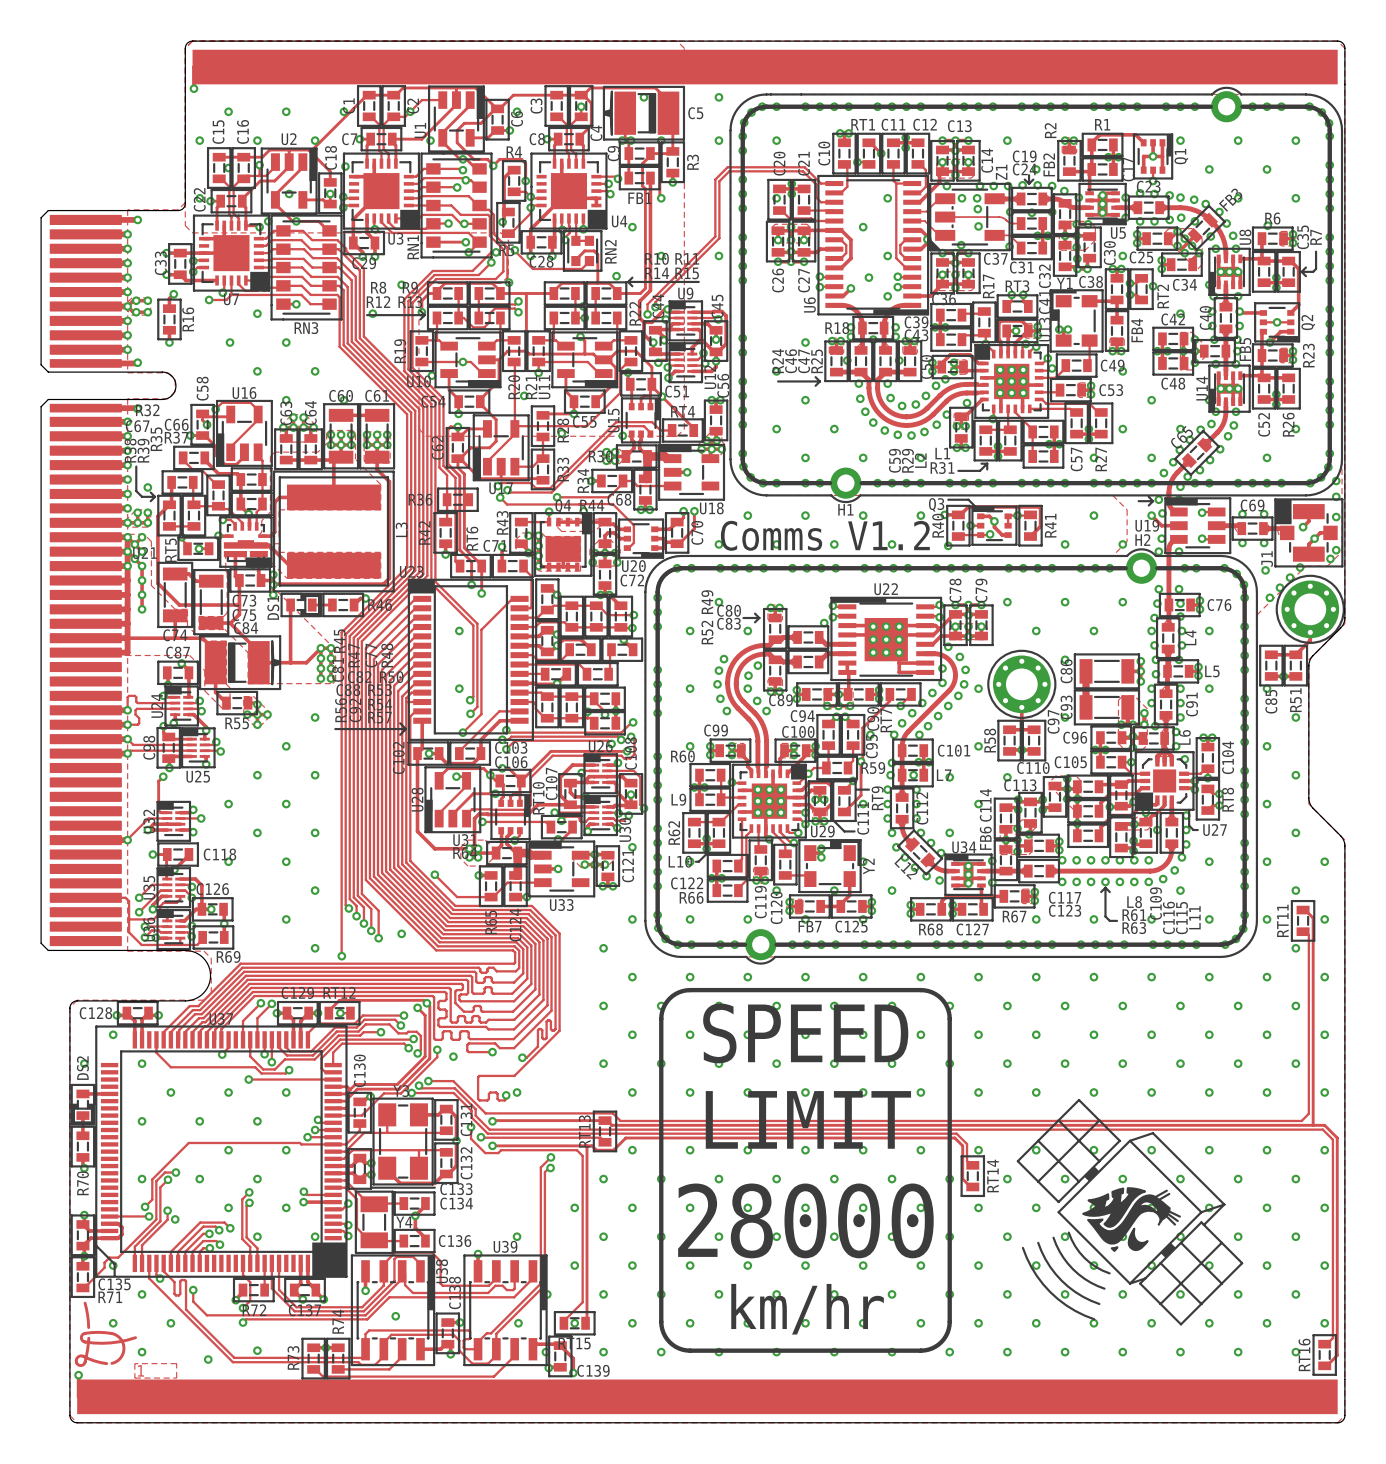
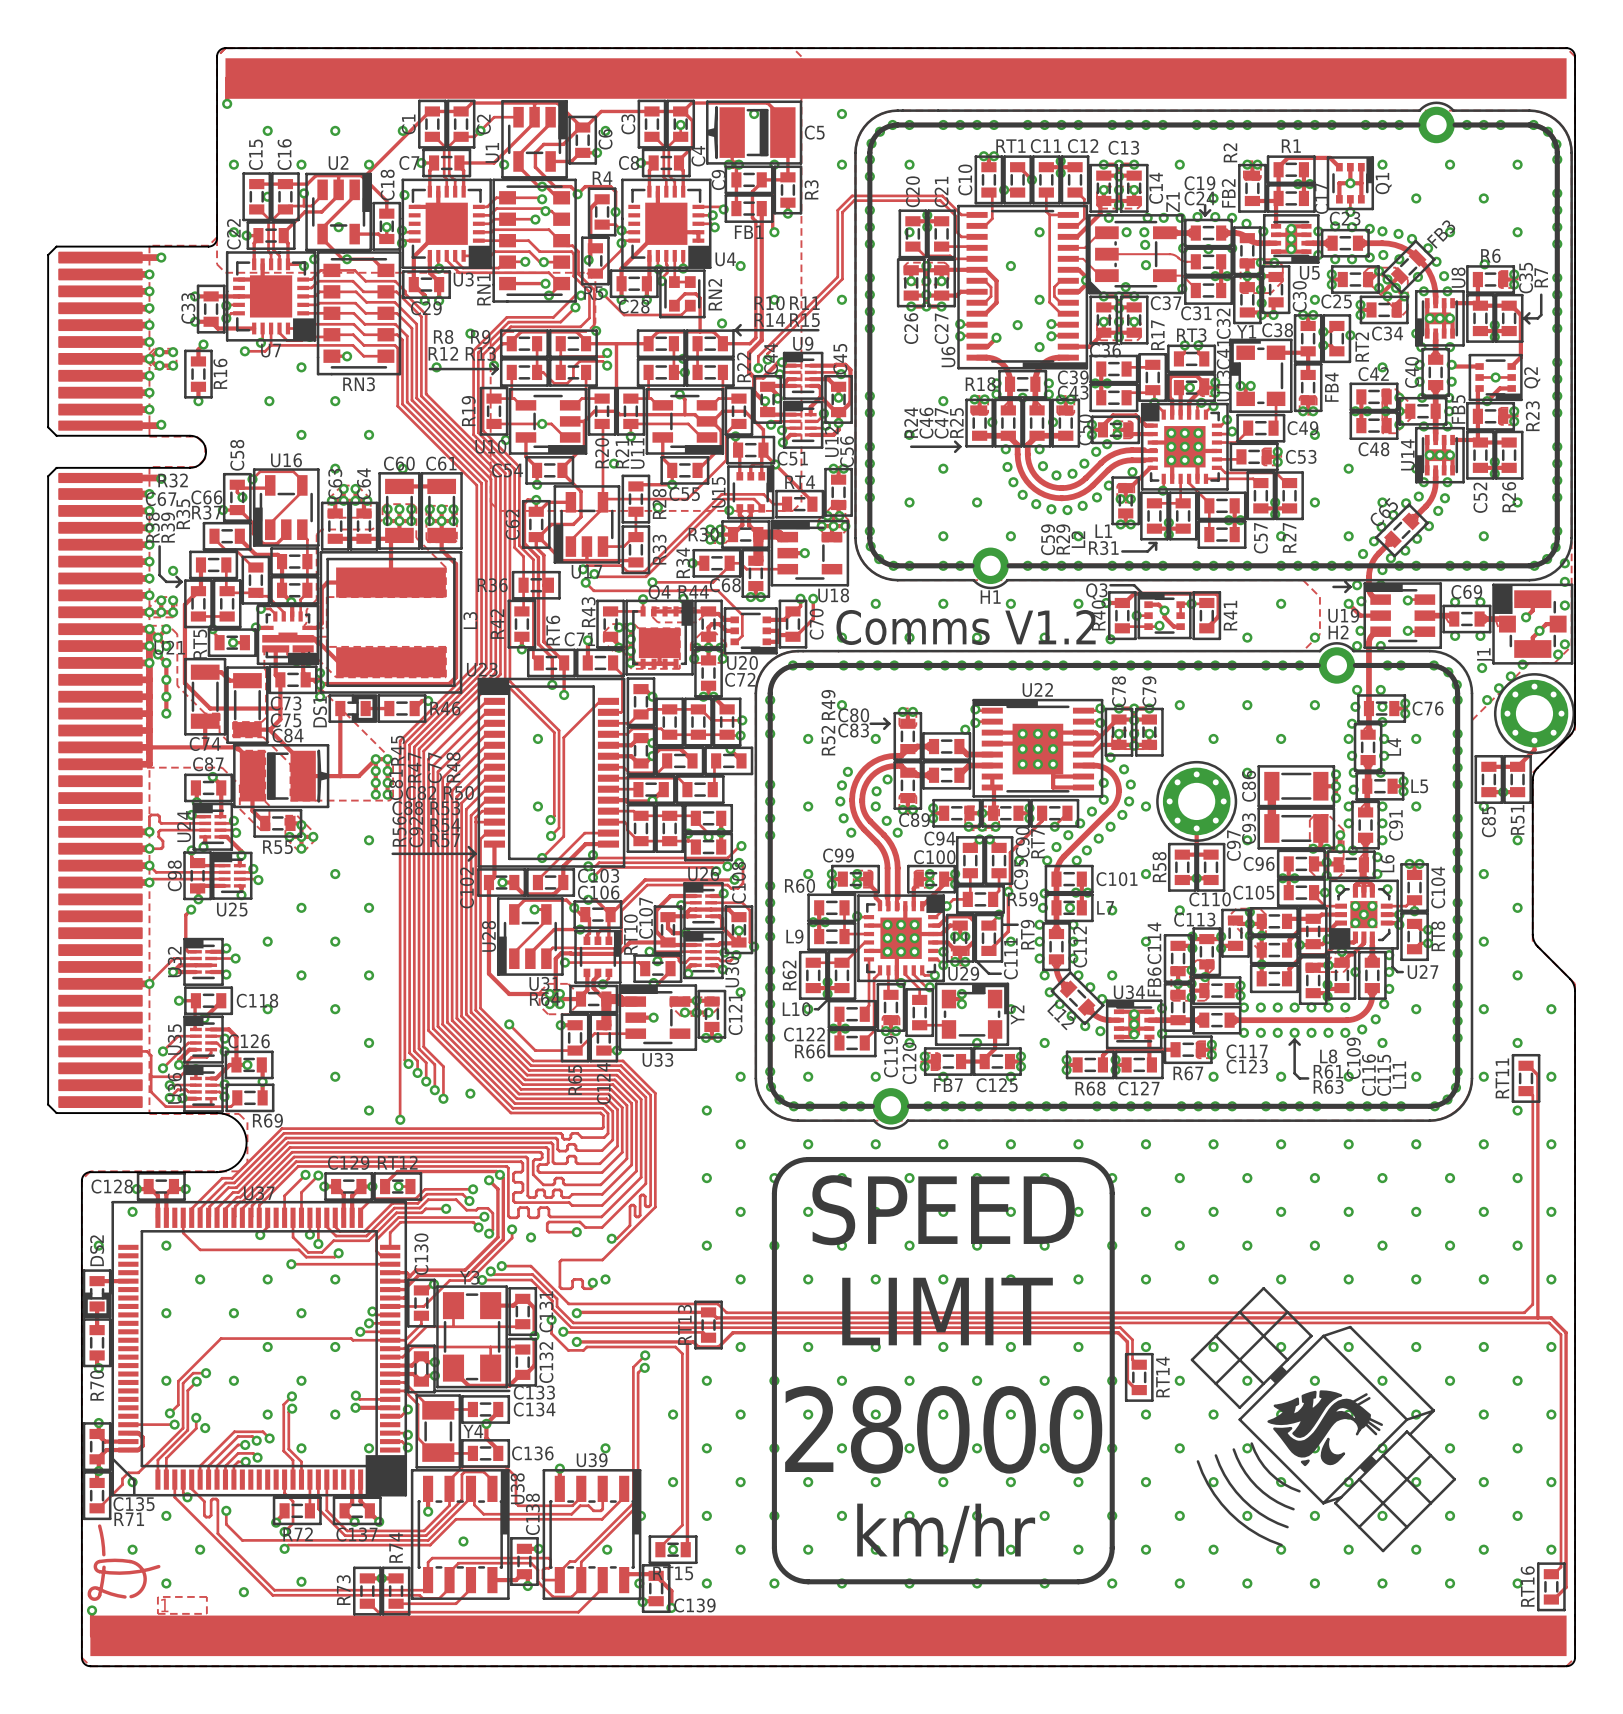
via: none -> (1340, 889)
via: none -> (1355, 906)
via: none -> (1372, 906)
via: none -> (1363, 914)
via: none -> (1355, 923)
via: none -> (1372, 923)

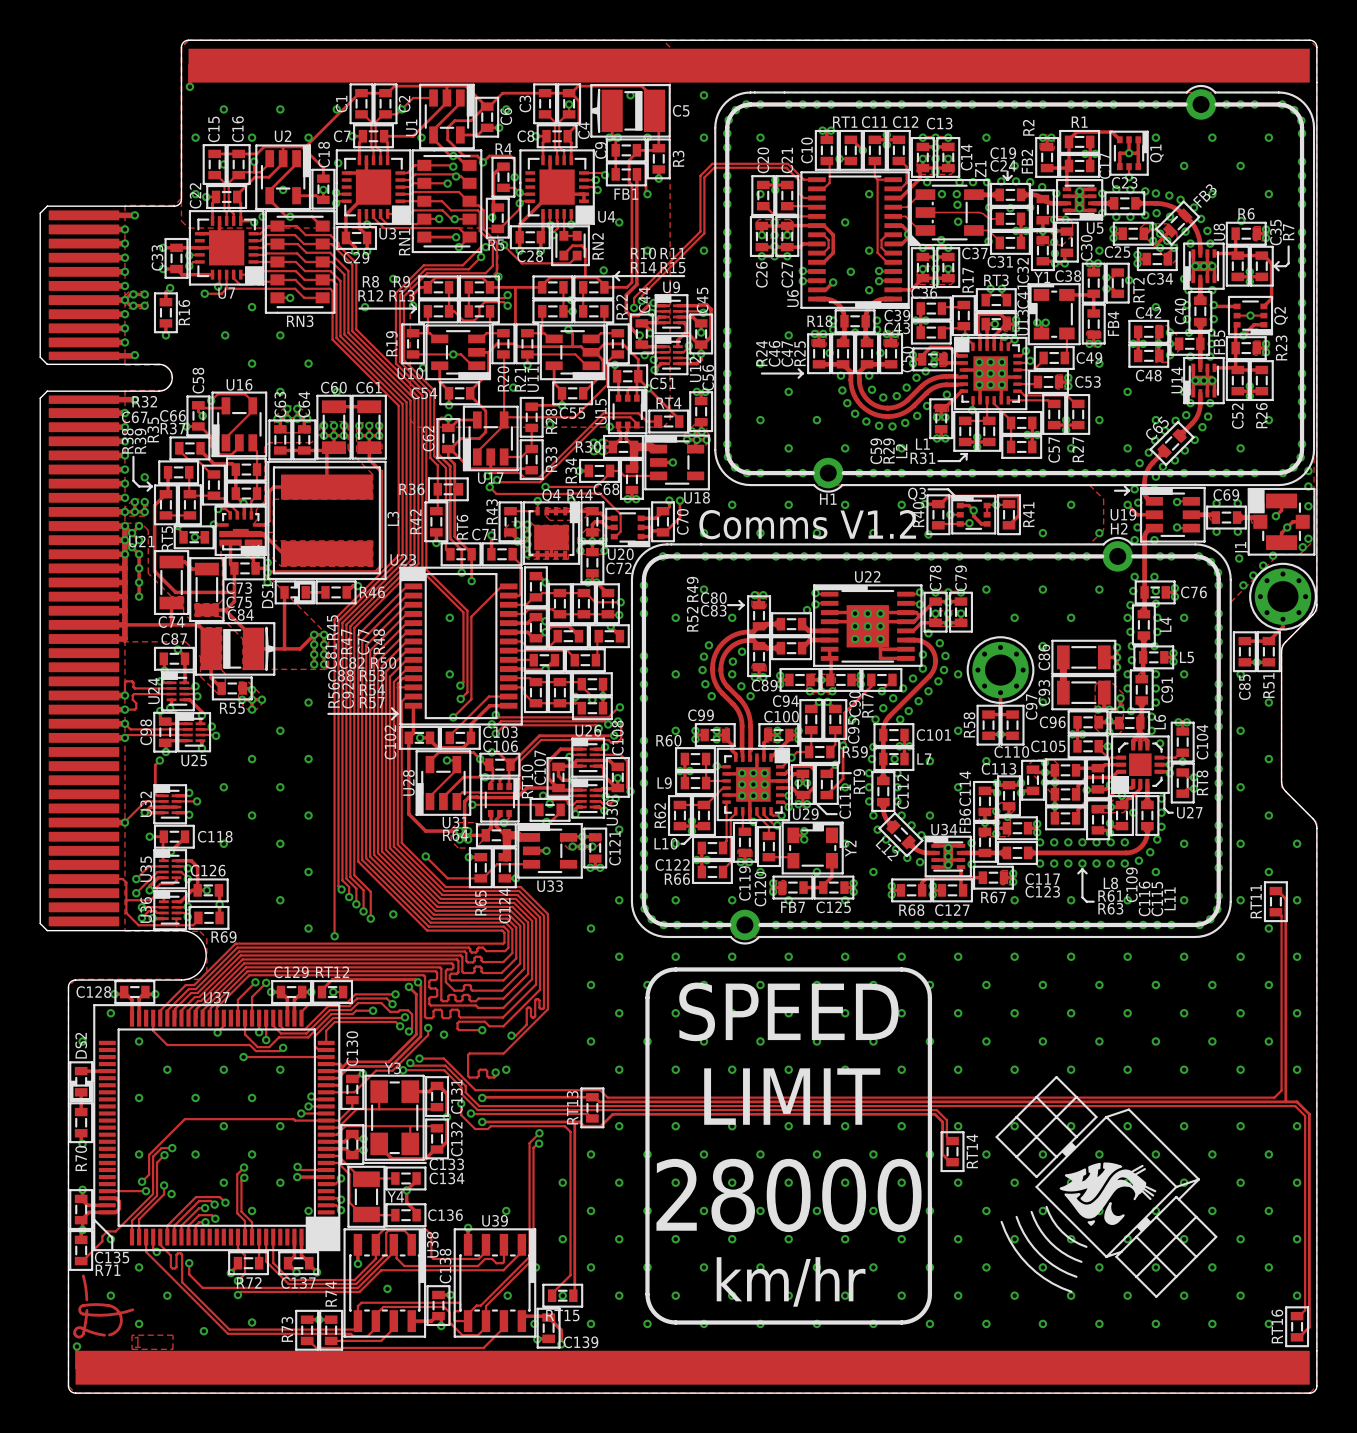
via: (1340, 889) -> none
via: (1355, 906) -> none
via: (1372, 906) -> none
via: (1363, 914) -> none
via: (1355, 923) -> none
via: (1372, 923) -> none

